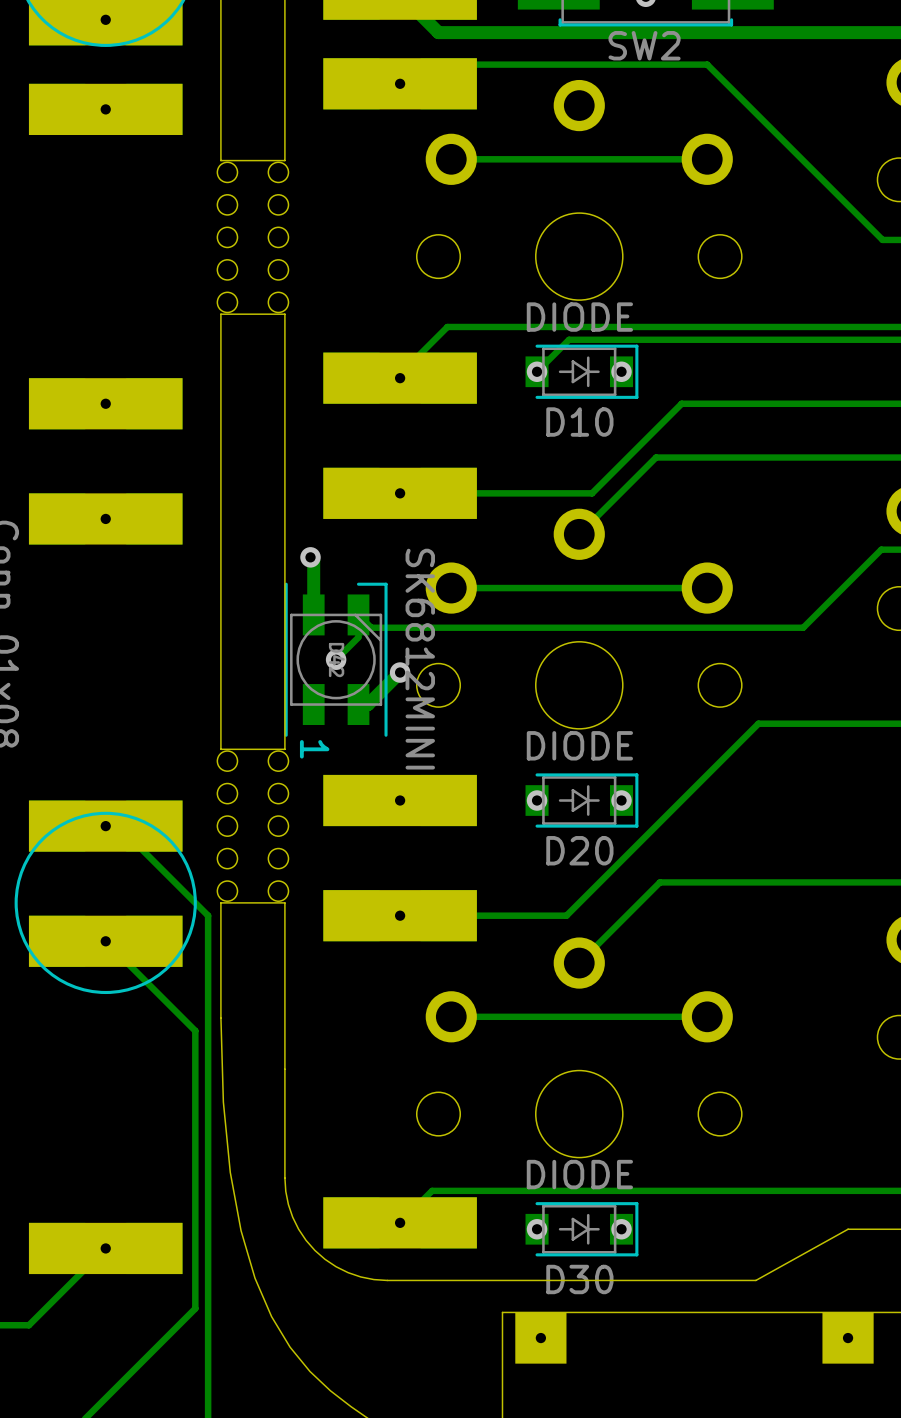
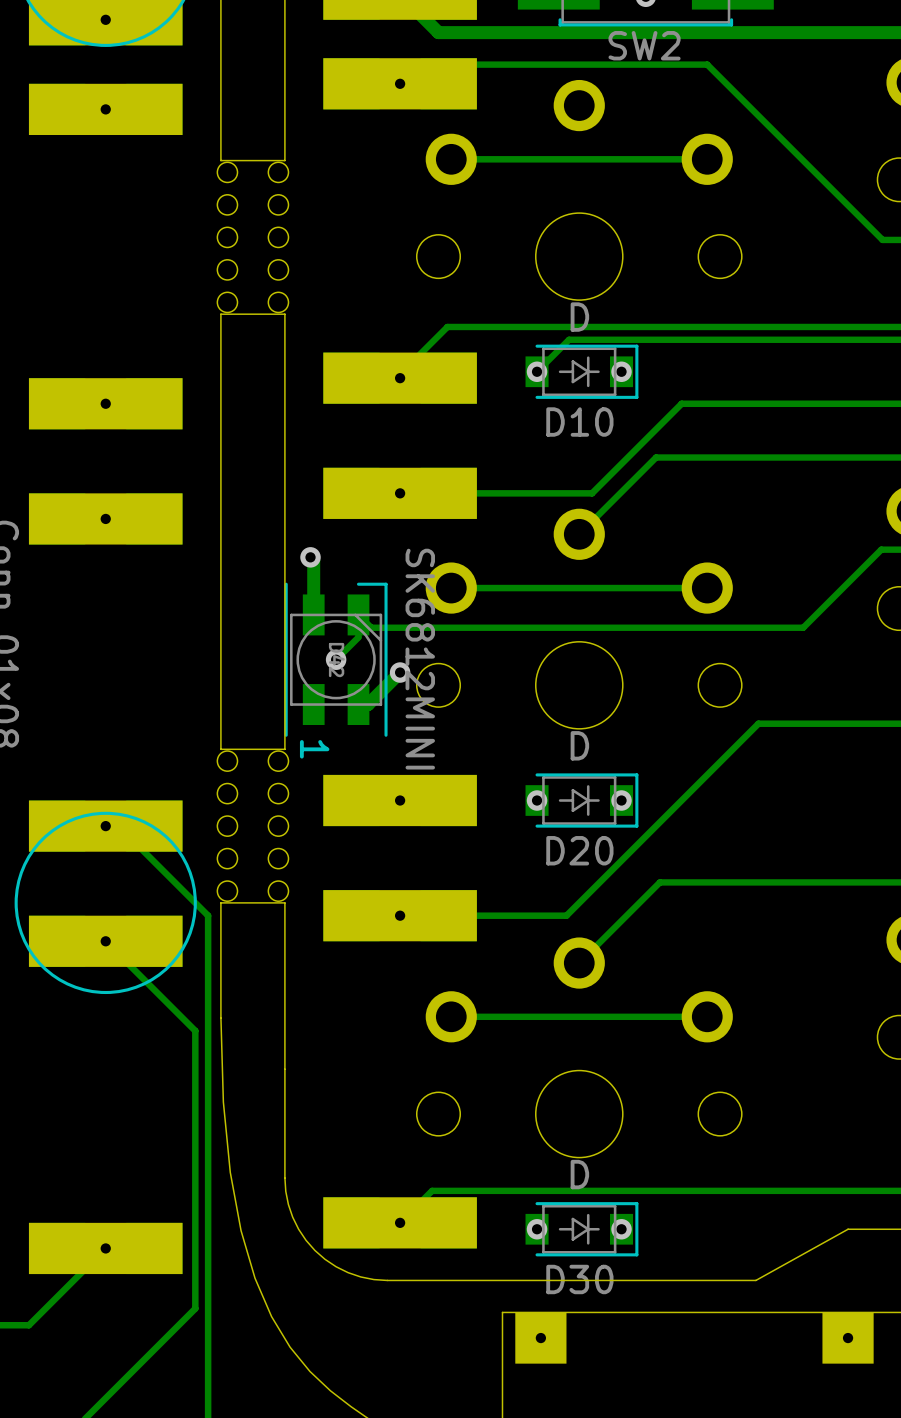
D10 value: DIODE (579, 317) -> D (579, 317)
D20 value: DIODE (579, 745) -> D (579, 745)
D30 value: DIODE (579, 1174) -> D (579, 1174)

